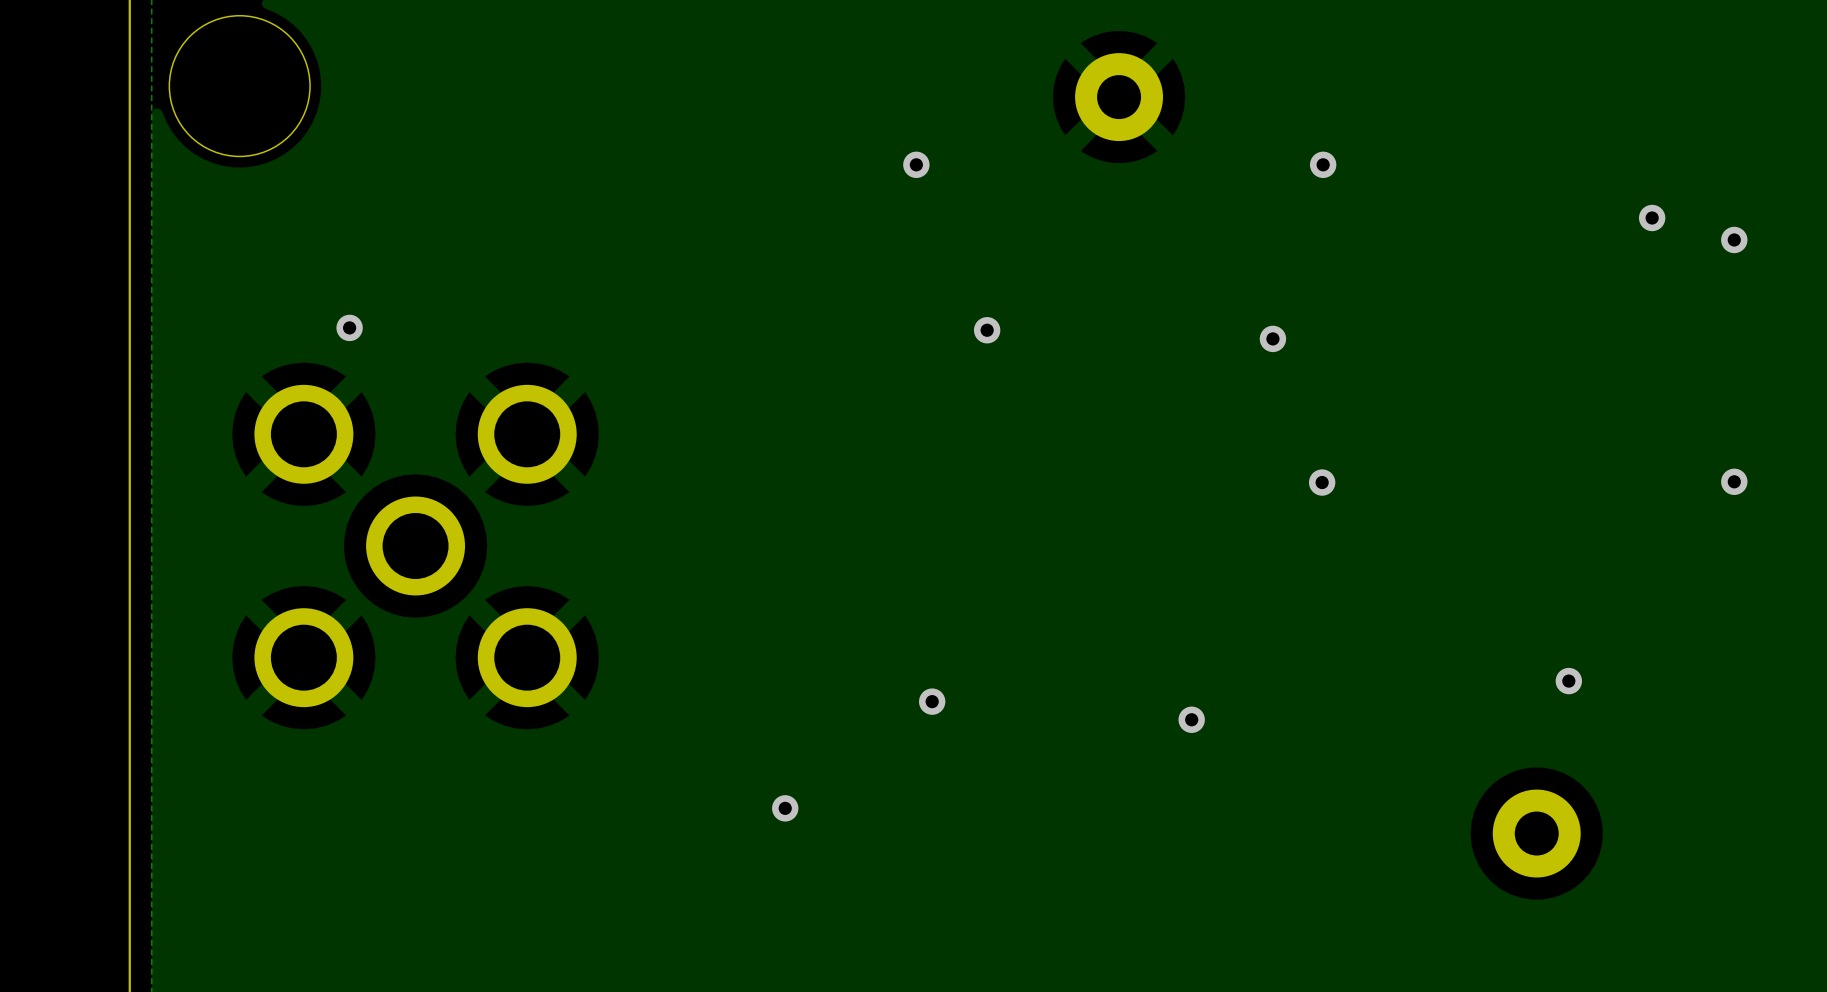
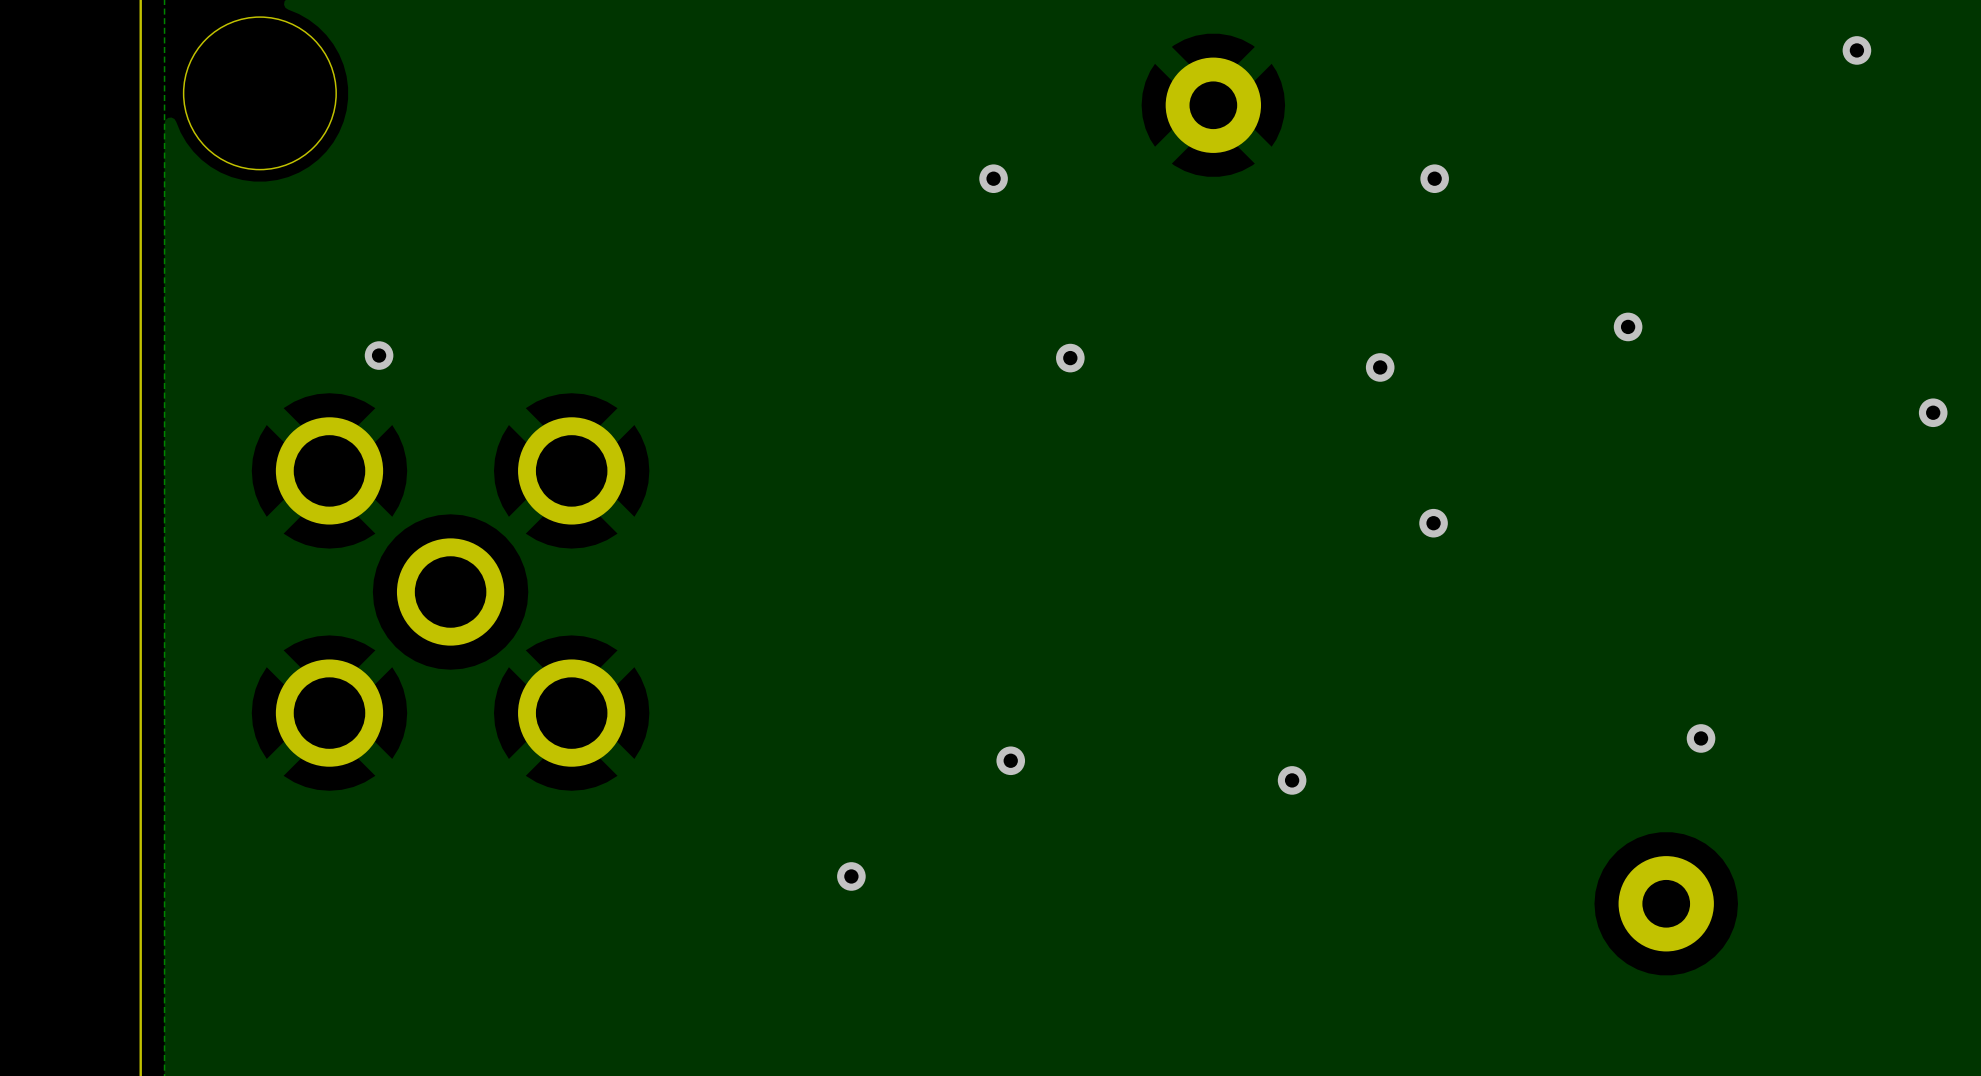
via: none -> (1856, 50)
via: (1652, 217) -> none
via: (1734, 239) -> none
via: none -> (1628, 326)
via: none -> (1933, 412)
via: (1734, 481) -> none

